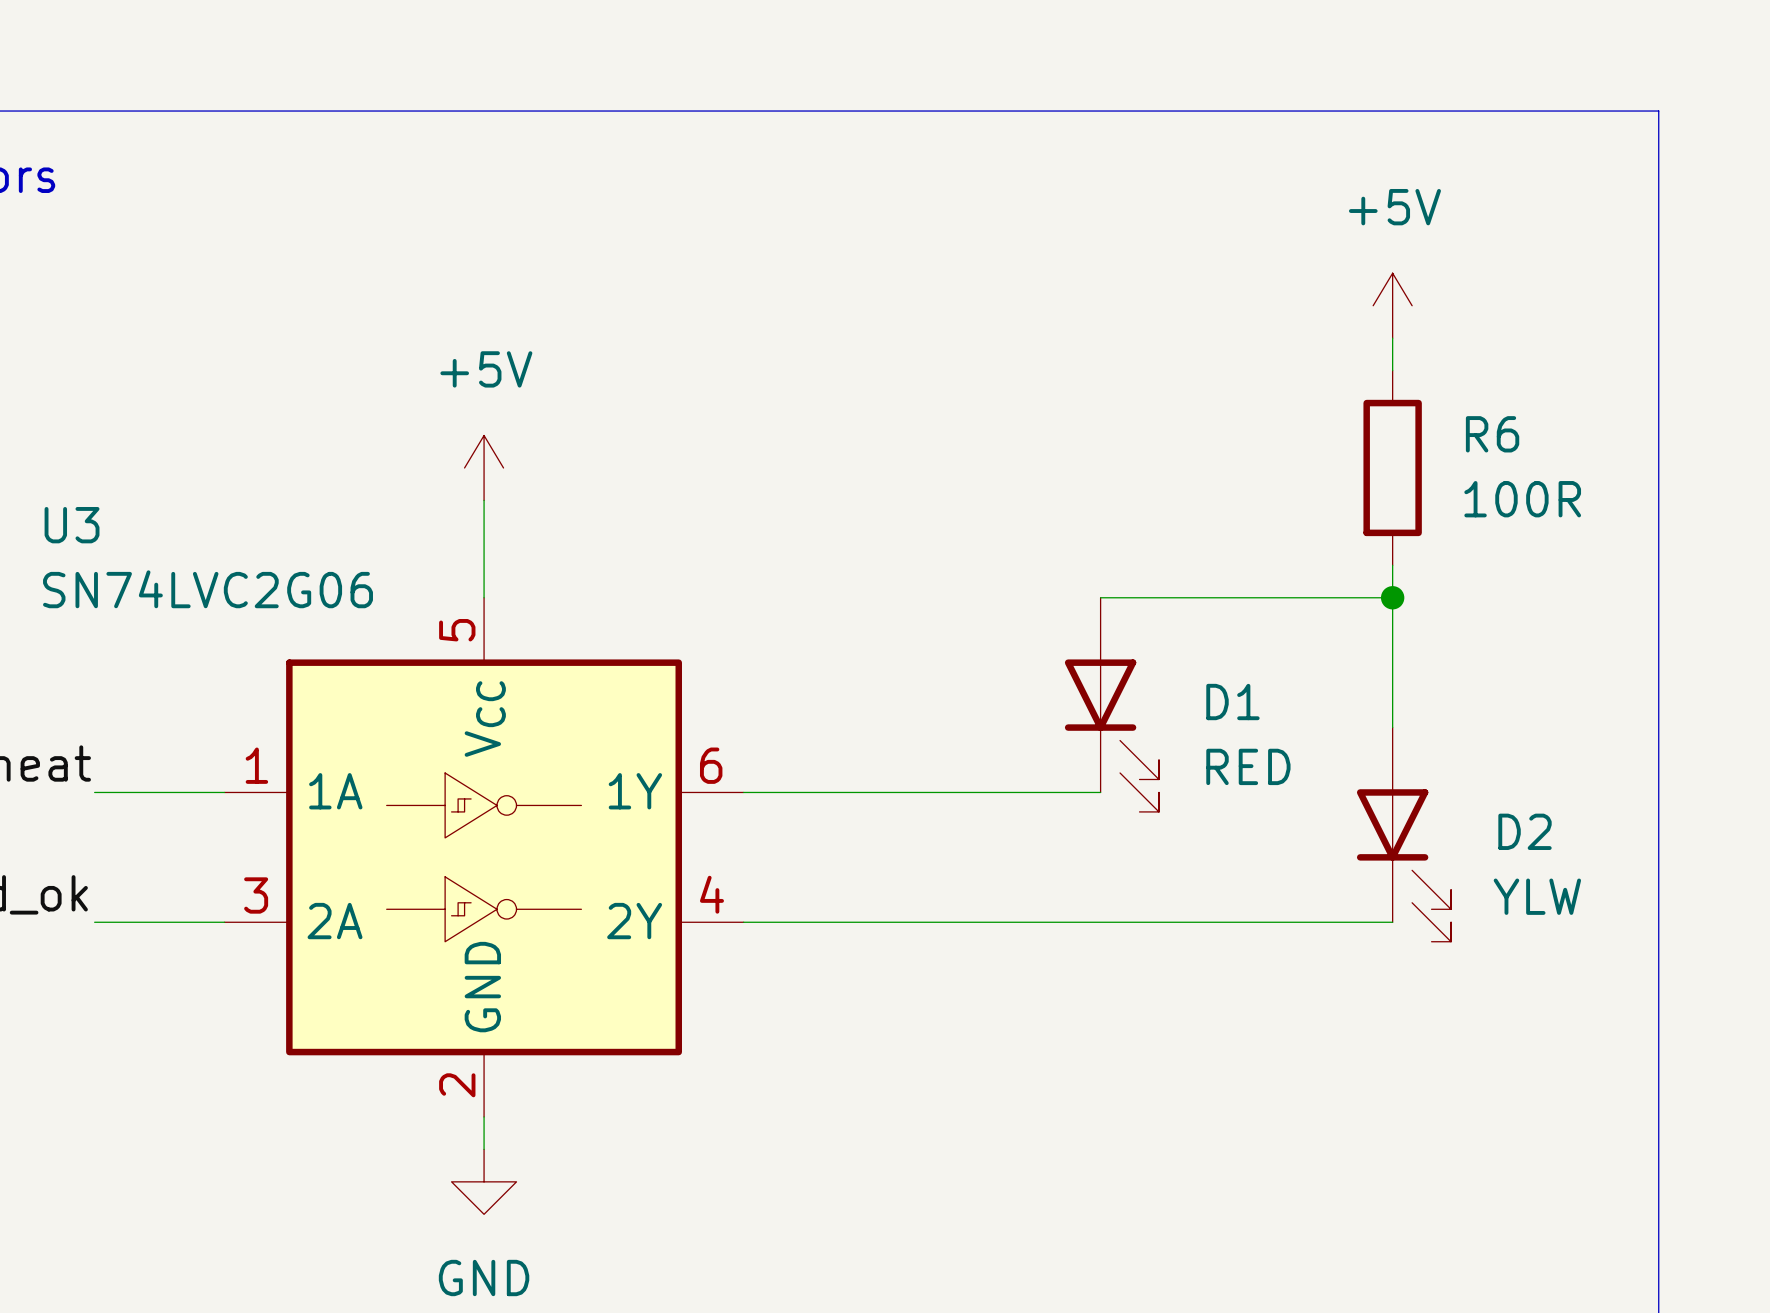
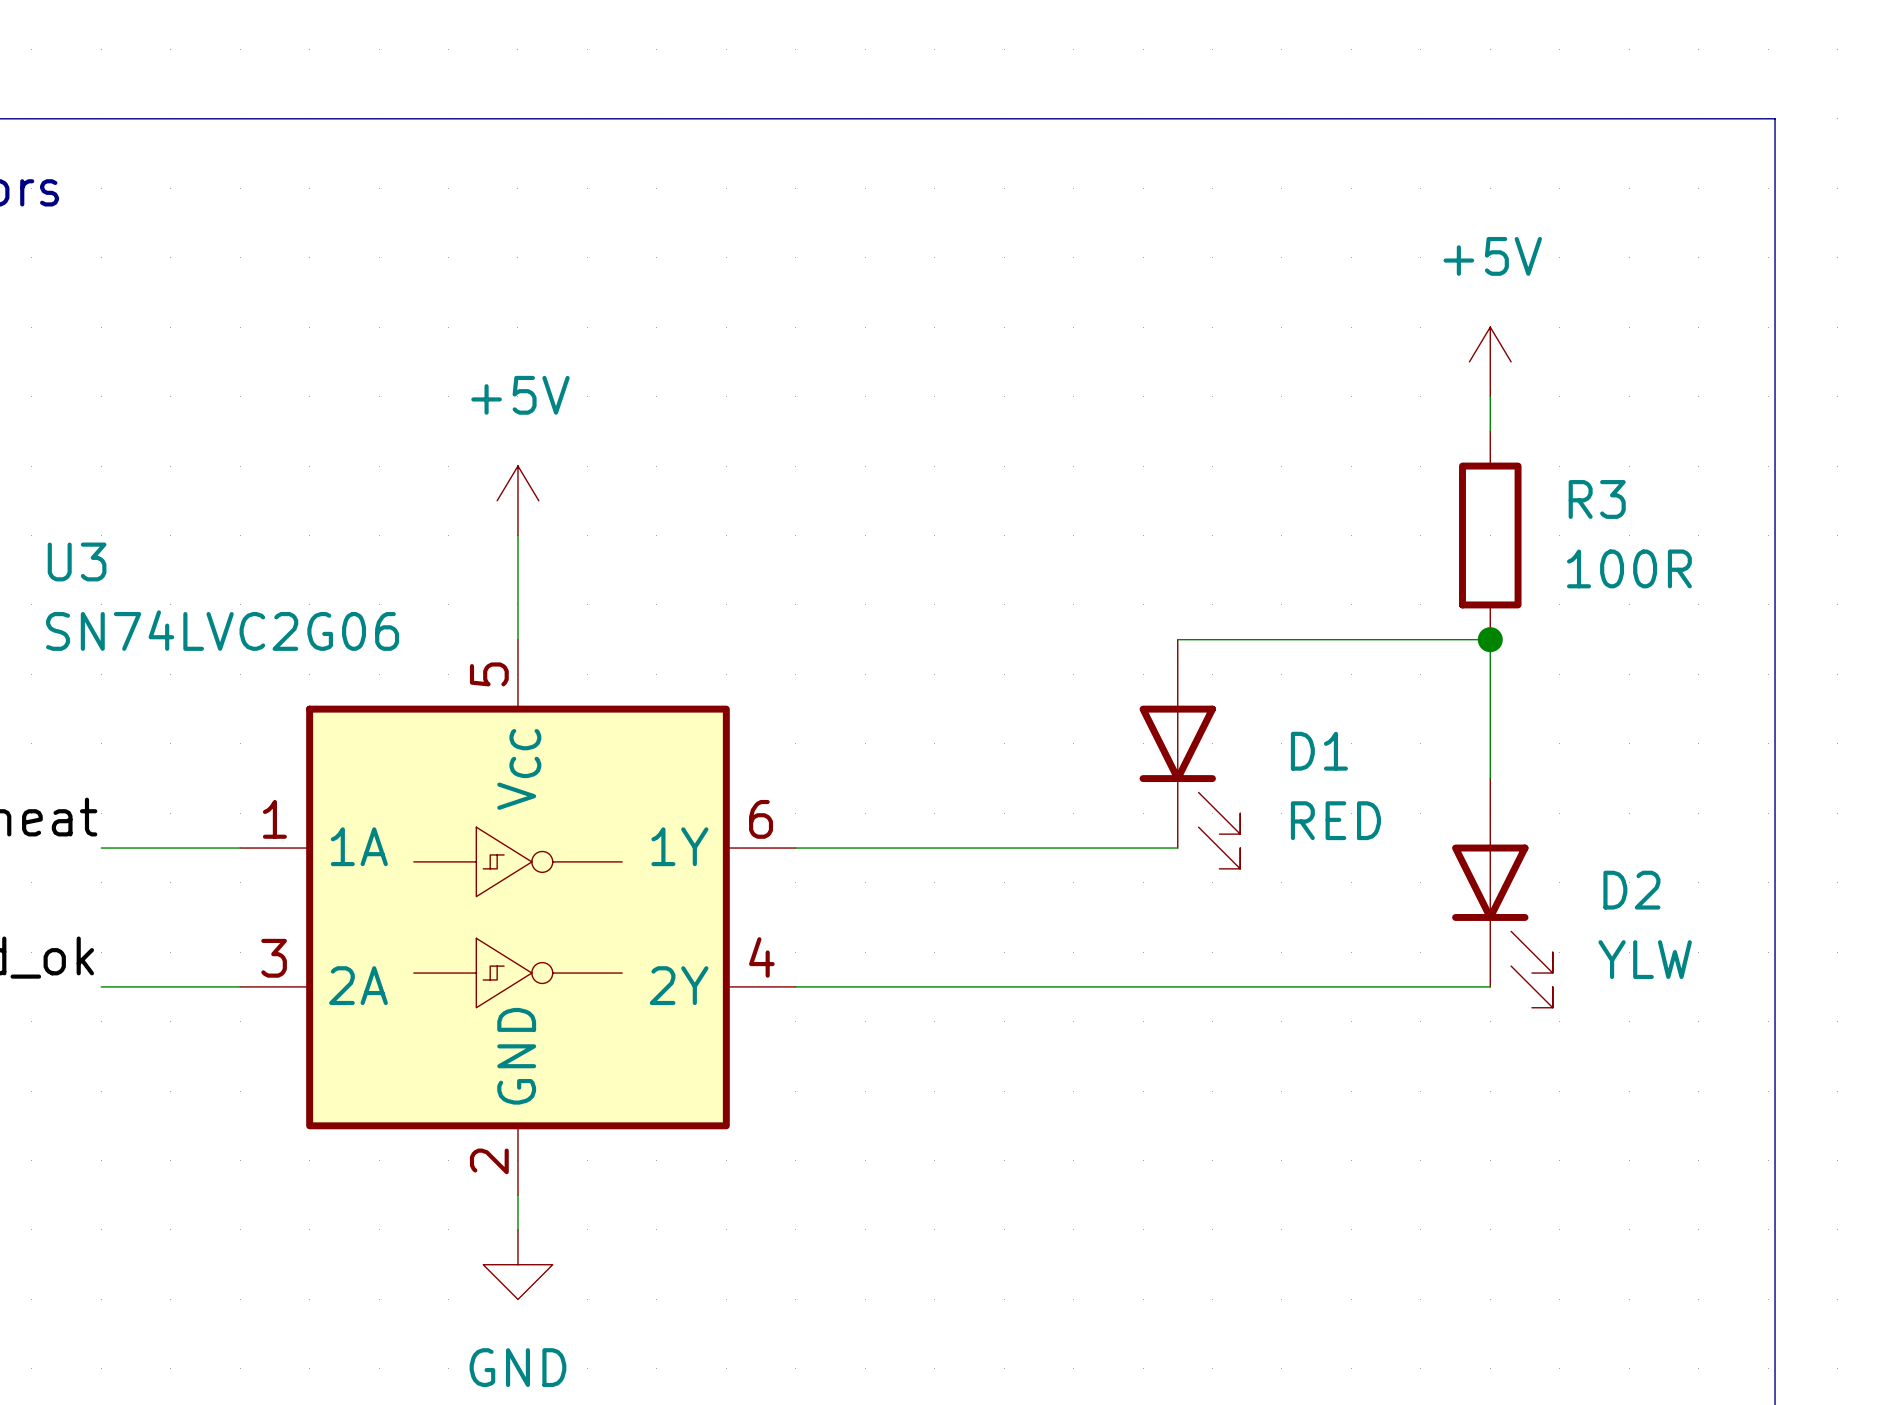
power symbol position: +5V (1392, 305) -> +5V (1490, 361)
R6: 100R (1392, 467) -> none
R3: none -> 100R (1490, 535)

